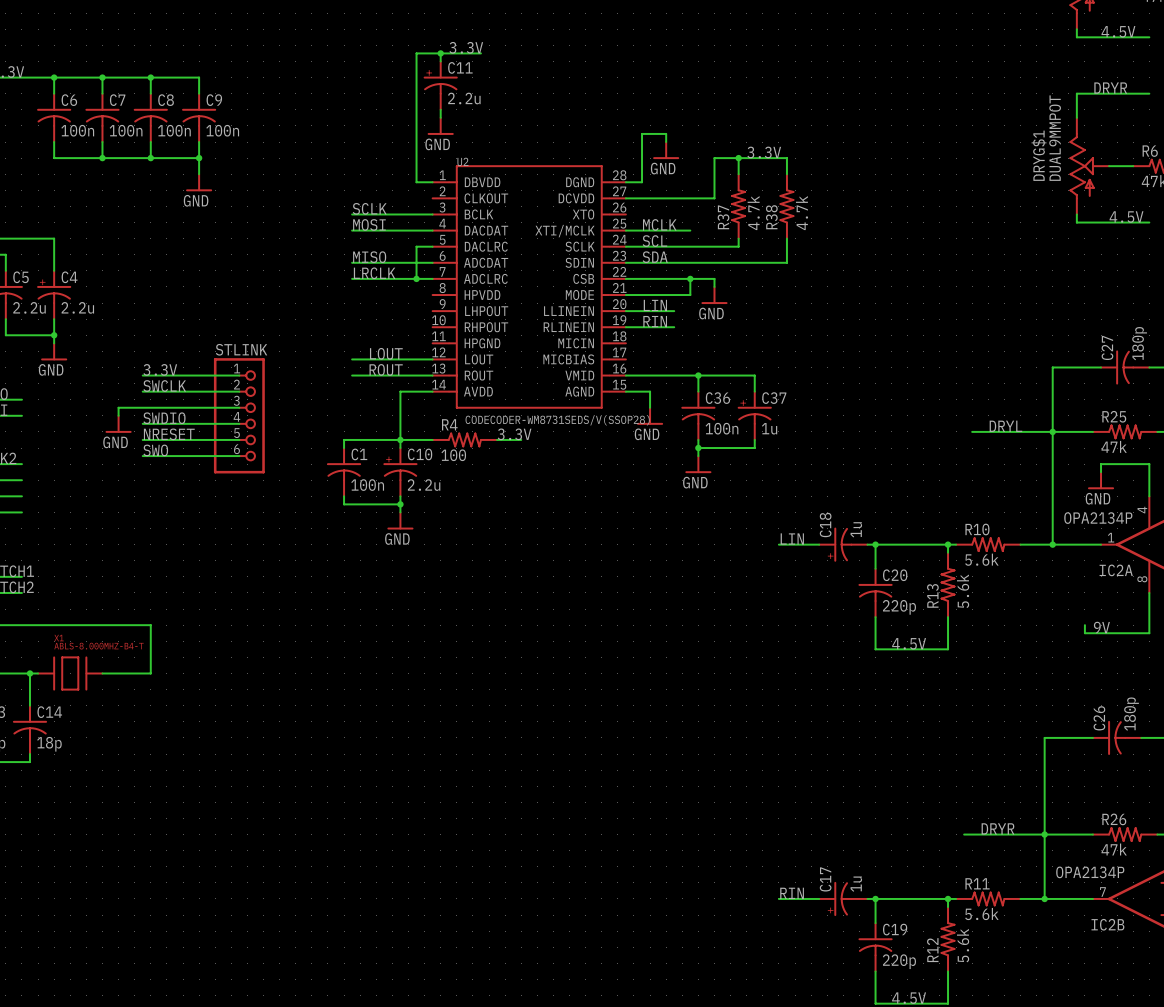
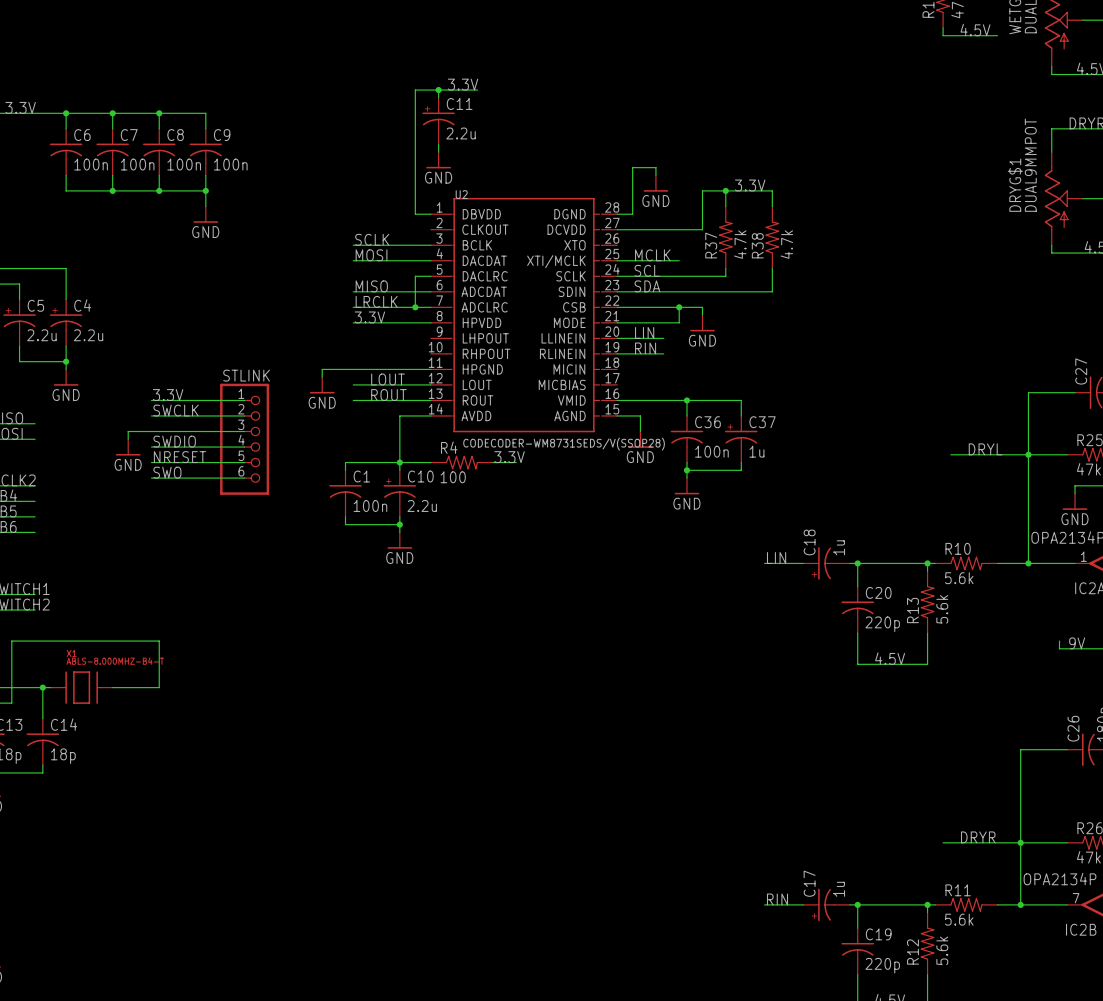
label: none -> 3.3V (369, 317)
wire: none -> (353, 322) (430, 322)
wire: none -> (430, 369) (322, 369) (322, 377)
power symbol: none -> GND (322, 385)

